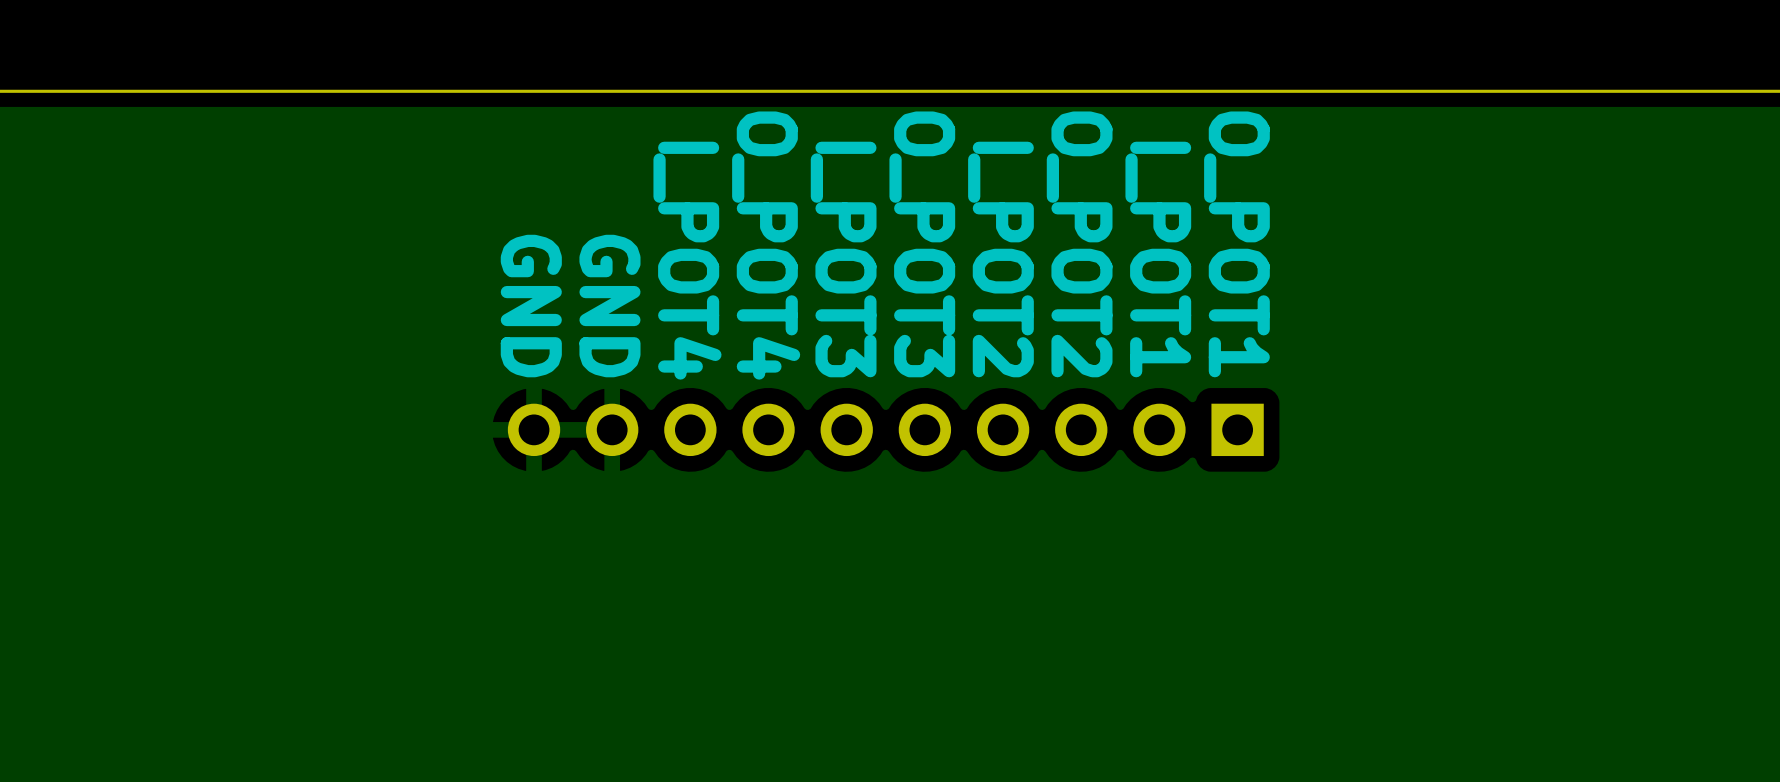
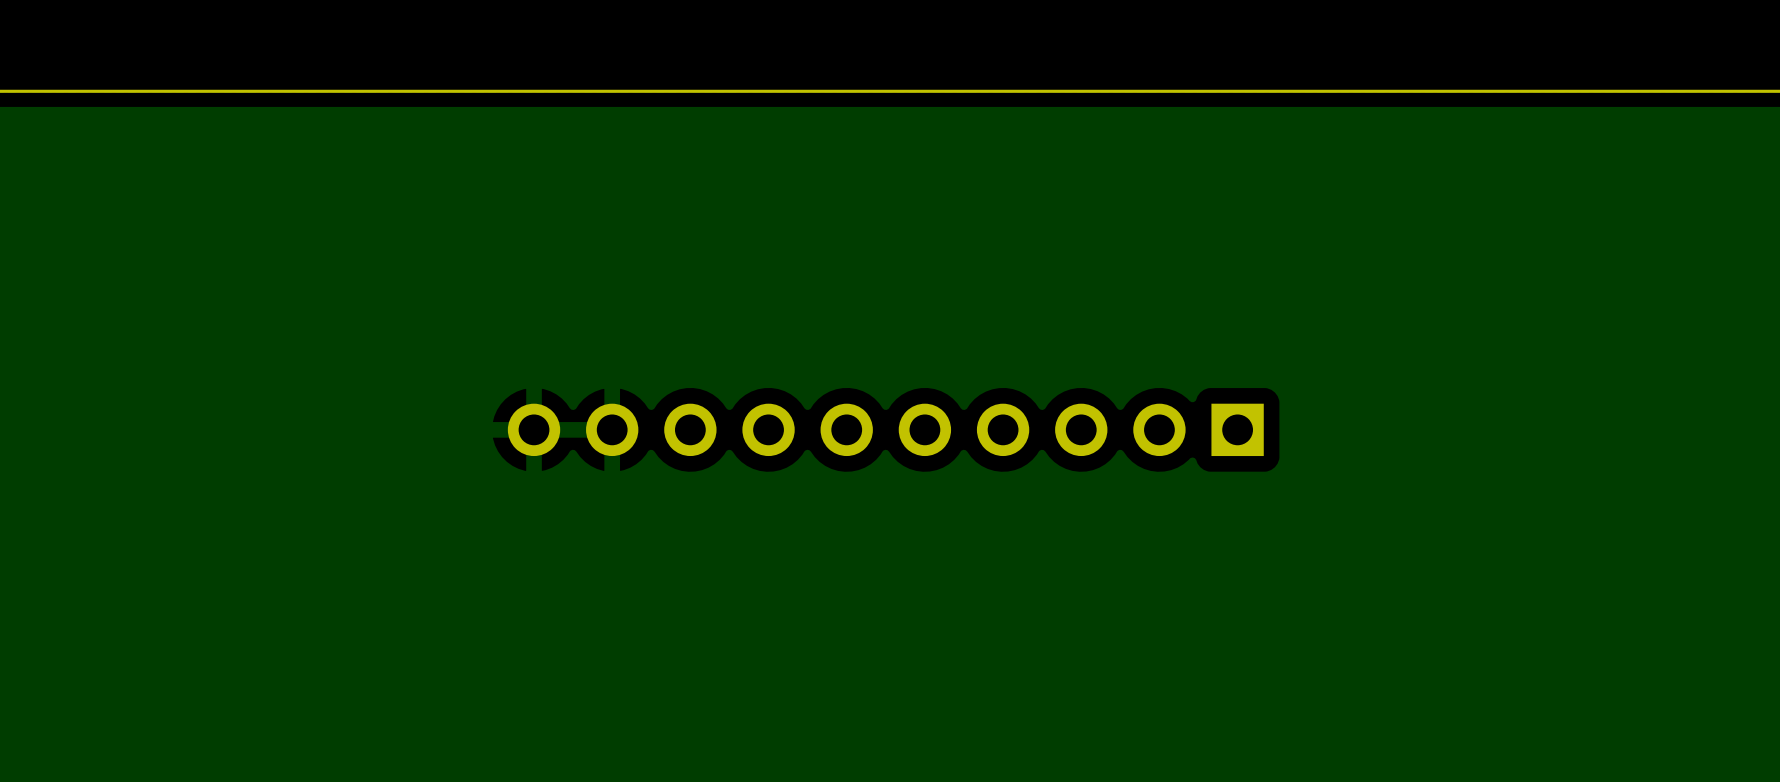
text: O_POT3 (922, 244) -> none
text: O_POT2 (1079, 244) -> none
text: O_POT1 (1236, 244) -> none
text: O_POT4 (766, 245) -> none
text: I_POT3 (843, 259) -> none
text: I_POT2 (1000, 259) -> none
text: I_POT1 (1158, 259) -> none
text: I_POT4 (687, 260) -> none
text: GND (531, 306) -> none
text: GND (609, 306) -> none

